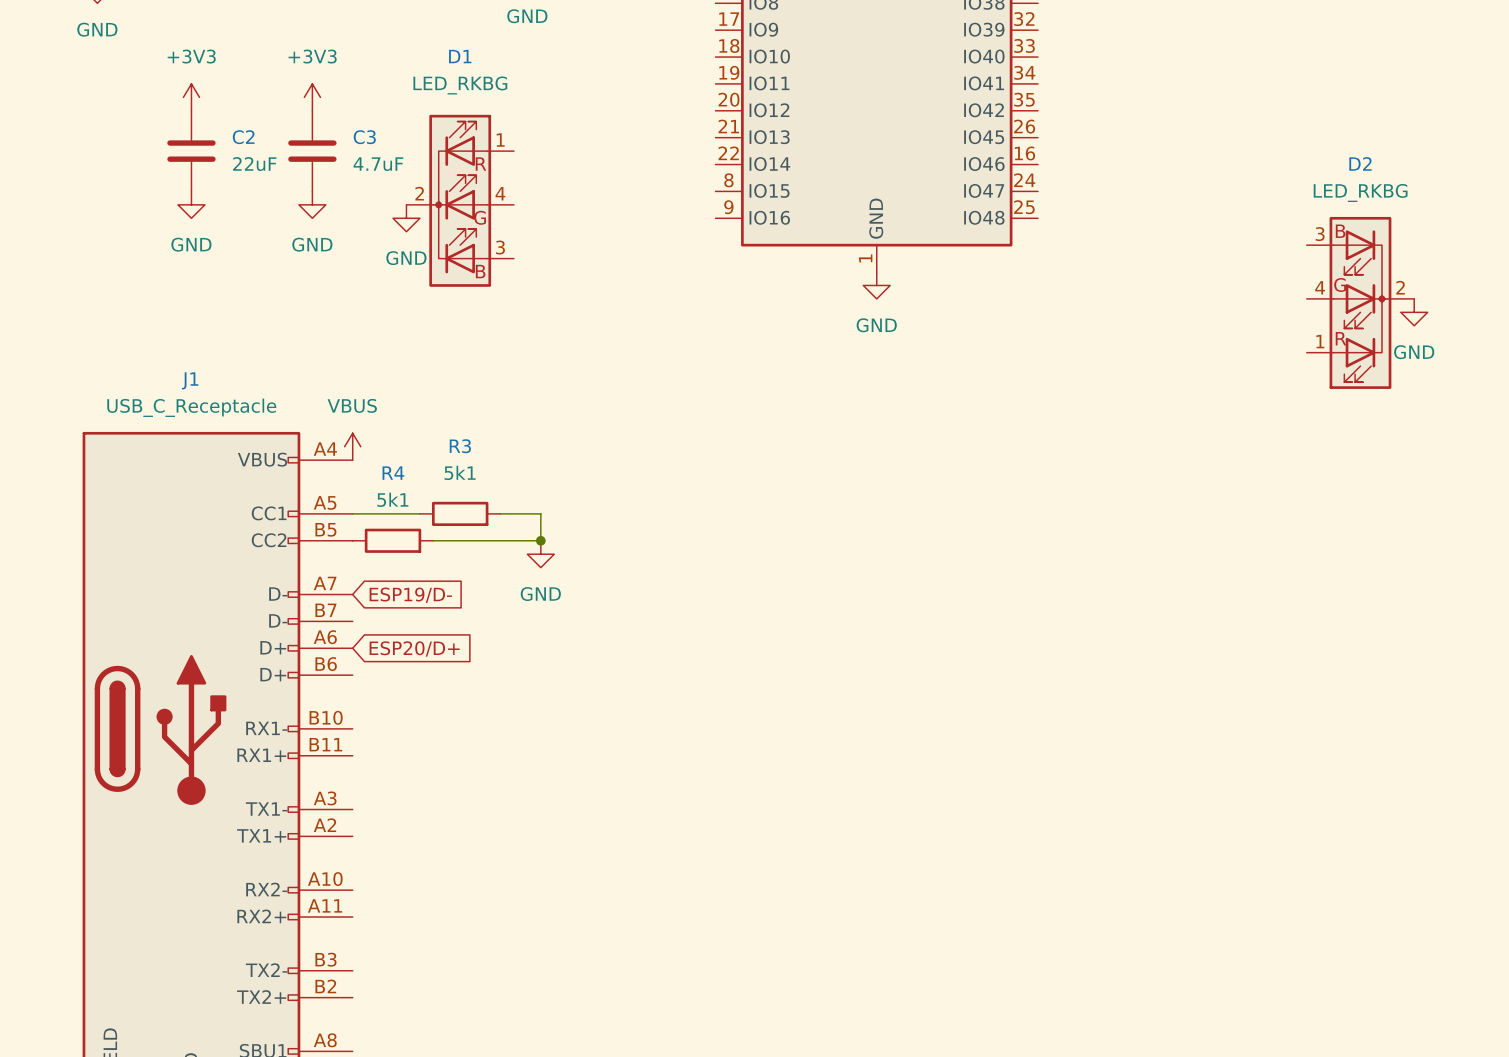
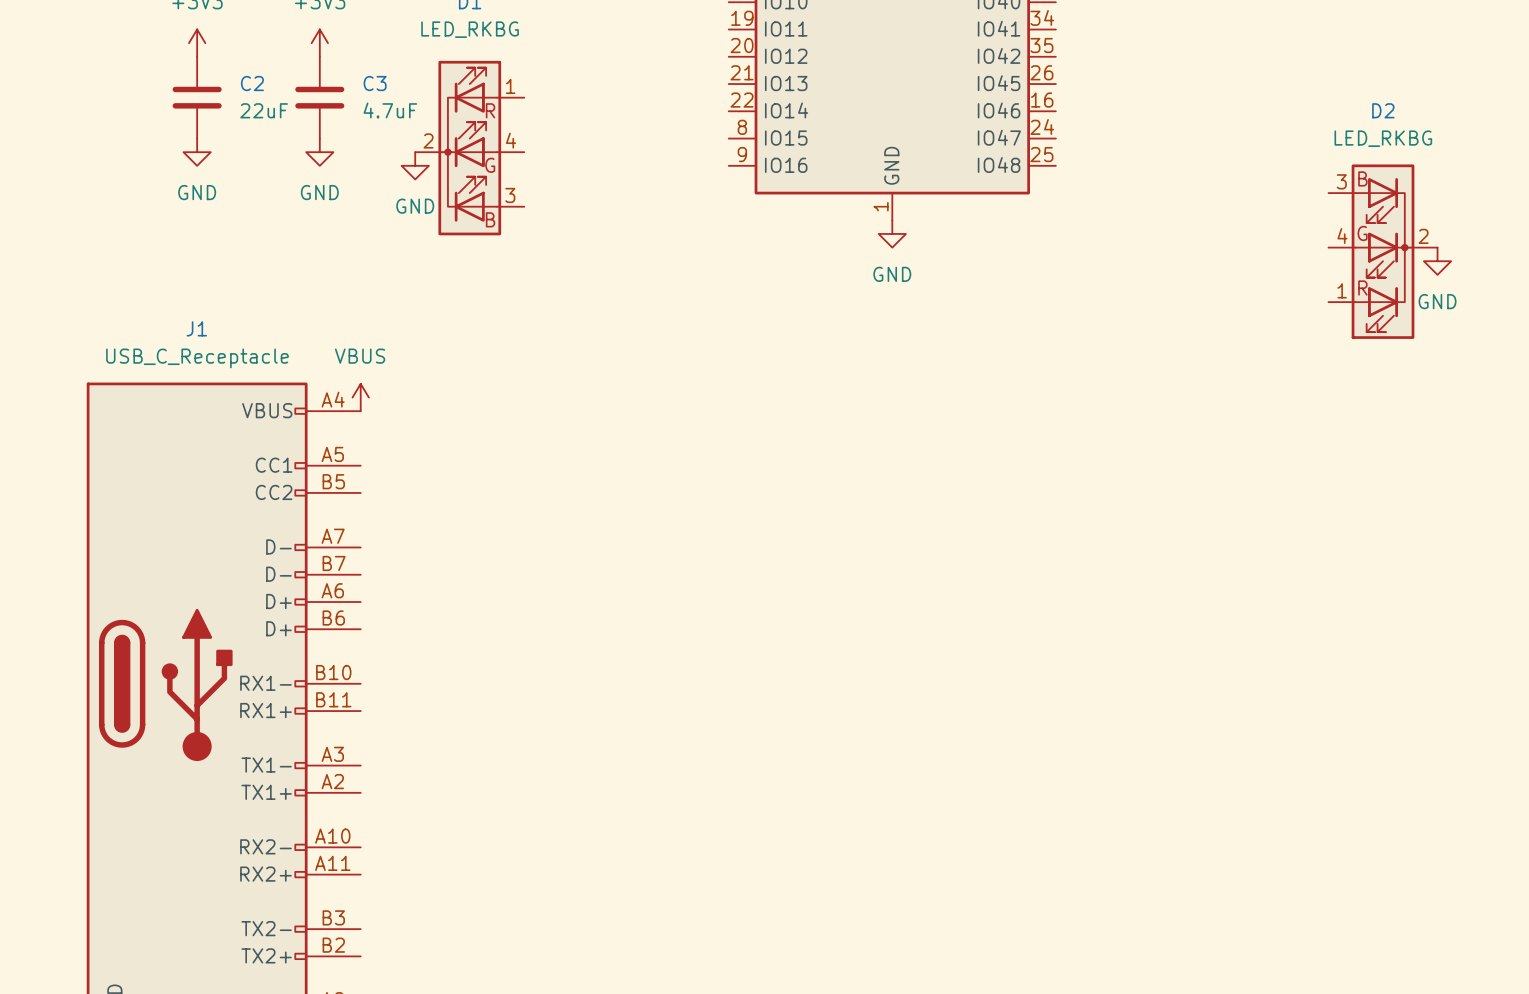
wire: (352, 513) (419, 513) -> none
R3: 5k1 (460, 513) -> none
wire: (500, 513) (540, 513) (540, 540) (433, 540) -> none
R4: 5k1 (393, 540) -> none
junction: (540, 540) -> none
power symbol: GND (540, 554) -> none
global label: ESP19/D- (410, 595) -> none
global label: ESP20/D+ (414, 649) -> none

